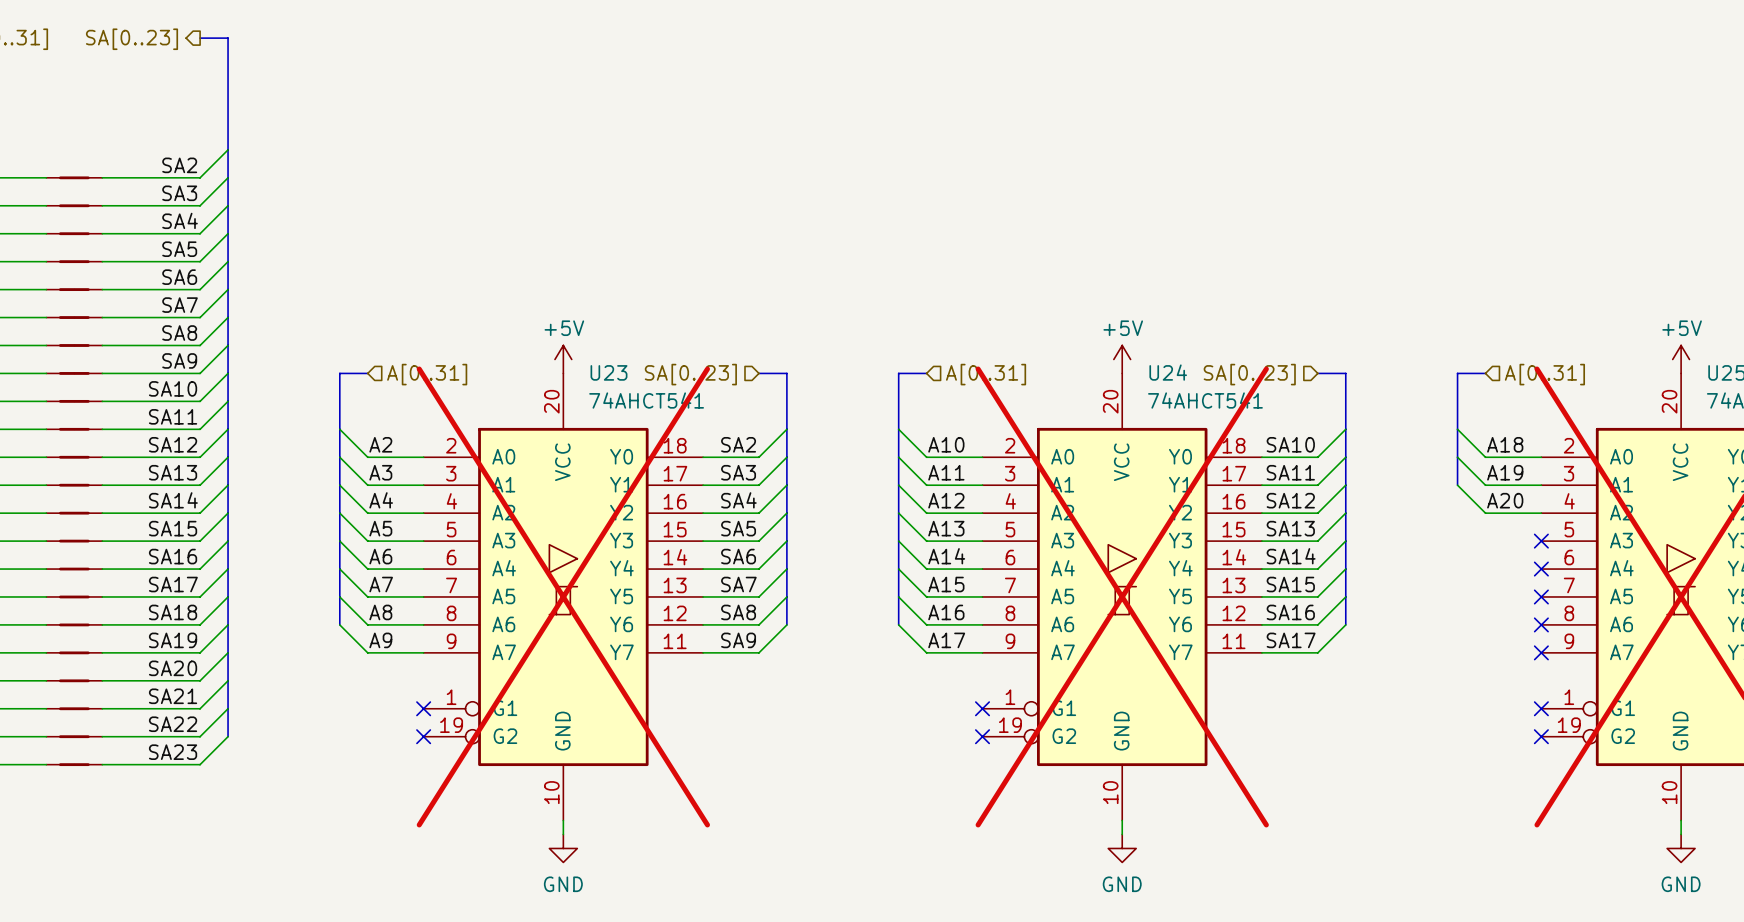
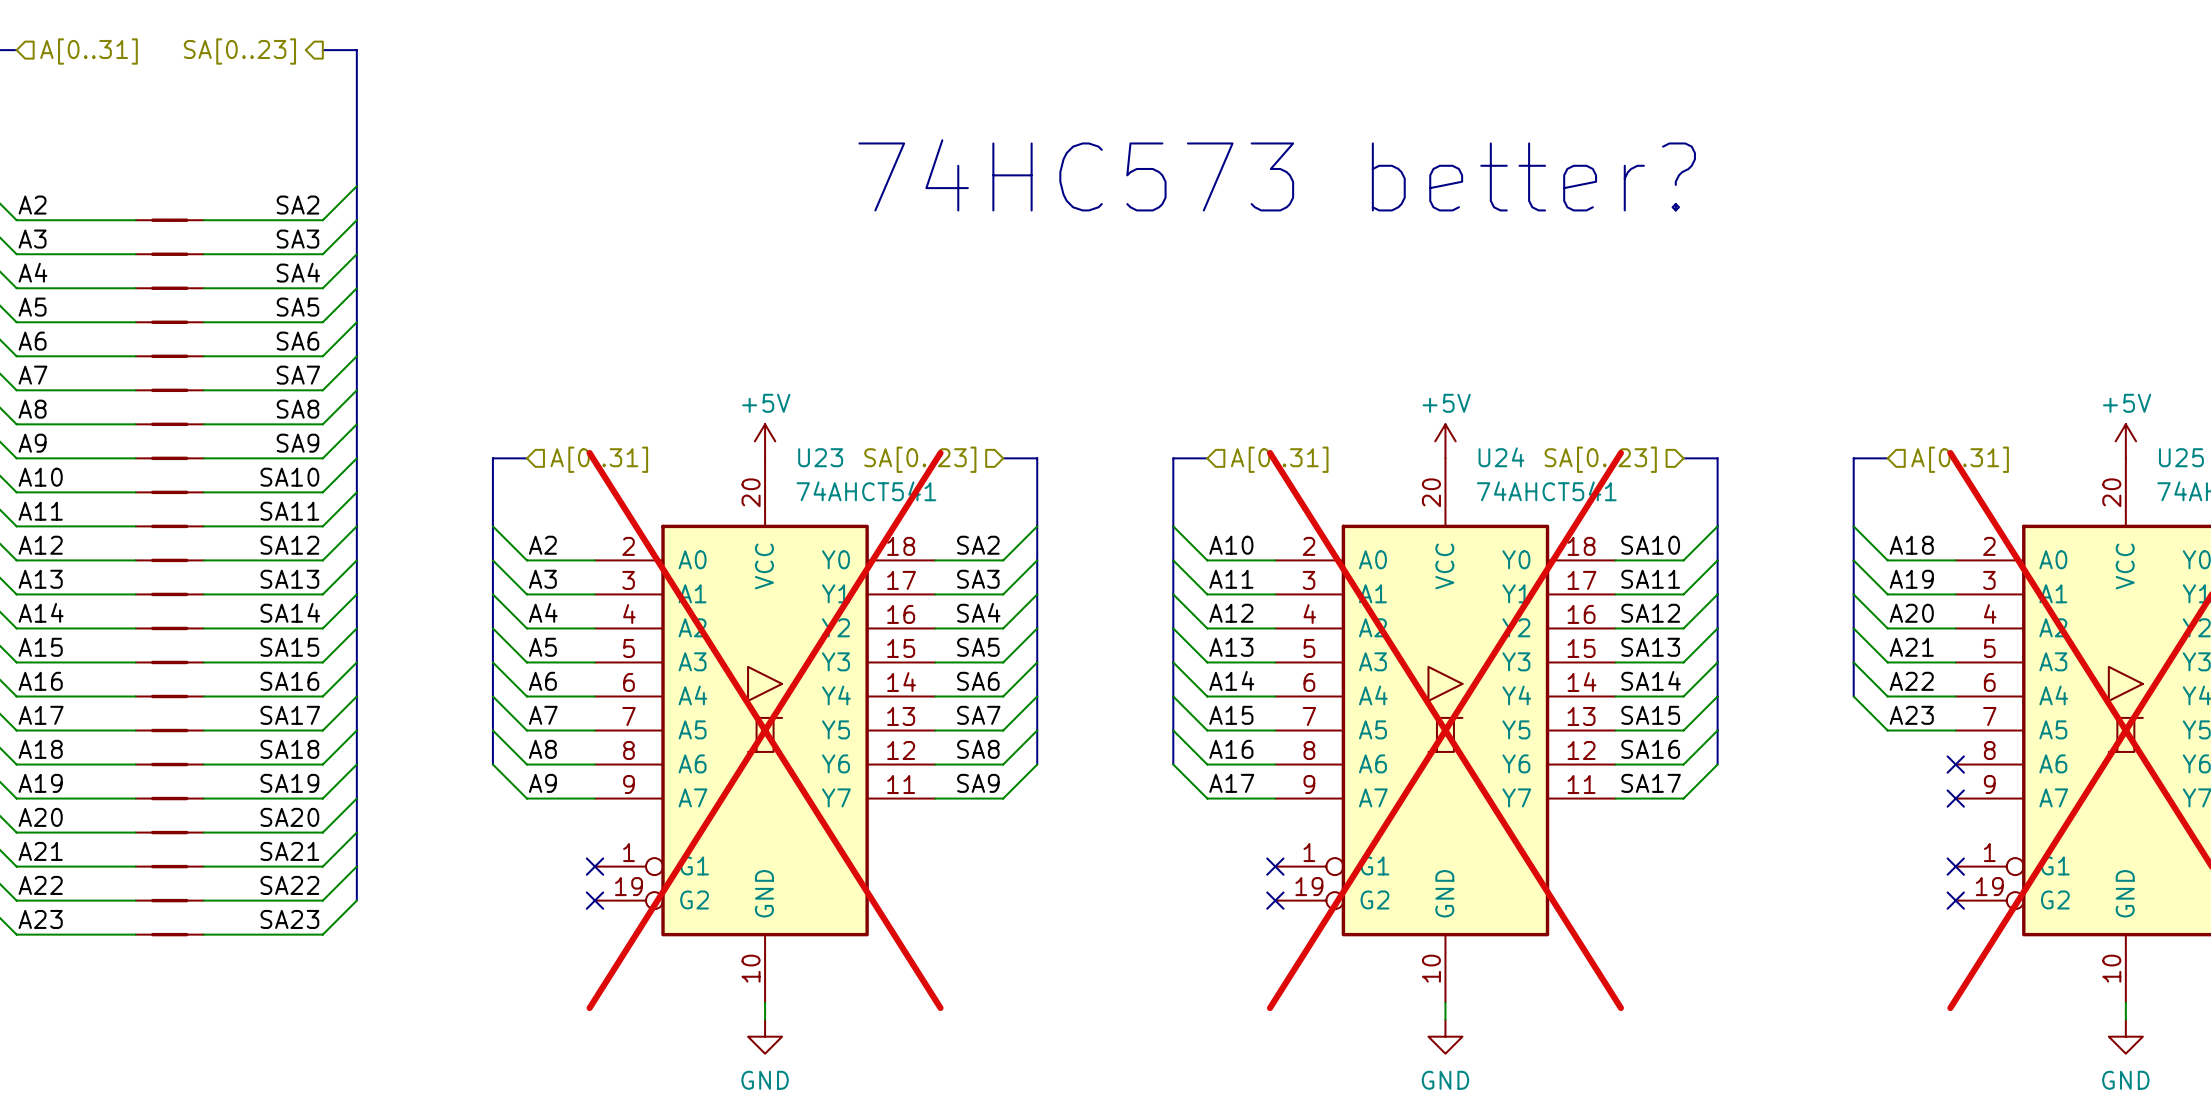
text: none -> 74HC573 better? (1277, 175)
bus: none -> (1853, 594) (1853, 696)
wire: none -> (1853, 628) (1887, 662) (1955, 662)
label: none -> A21 (1911, 647)
wire: none -> (1853, 662) (1887, 696) (1955, 696)
no-connect mark: (1541, 541) -> none
label: none -> A22 (1911, 681)
wire: none -> (1853, 696) (1887, 730) (1955, 730)
no-connect mark: (1541, 569) -> none
label: none -> A23 (1911, 715)
no-connect mark: (1541, 596) -> none

